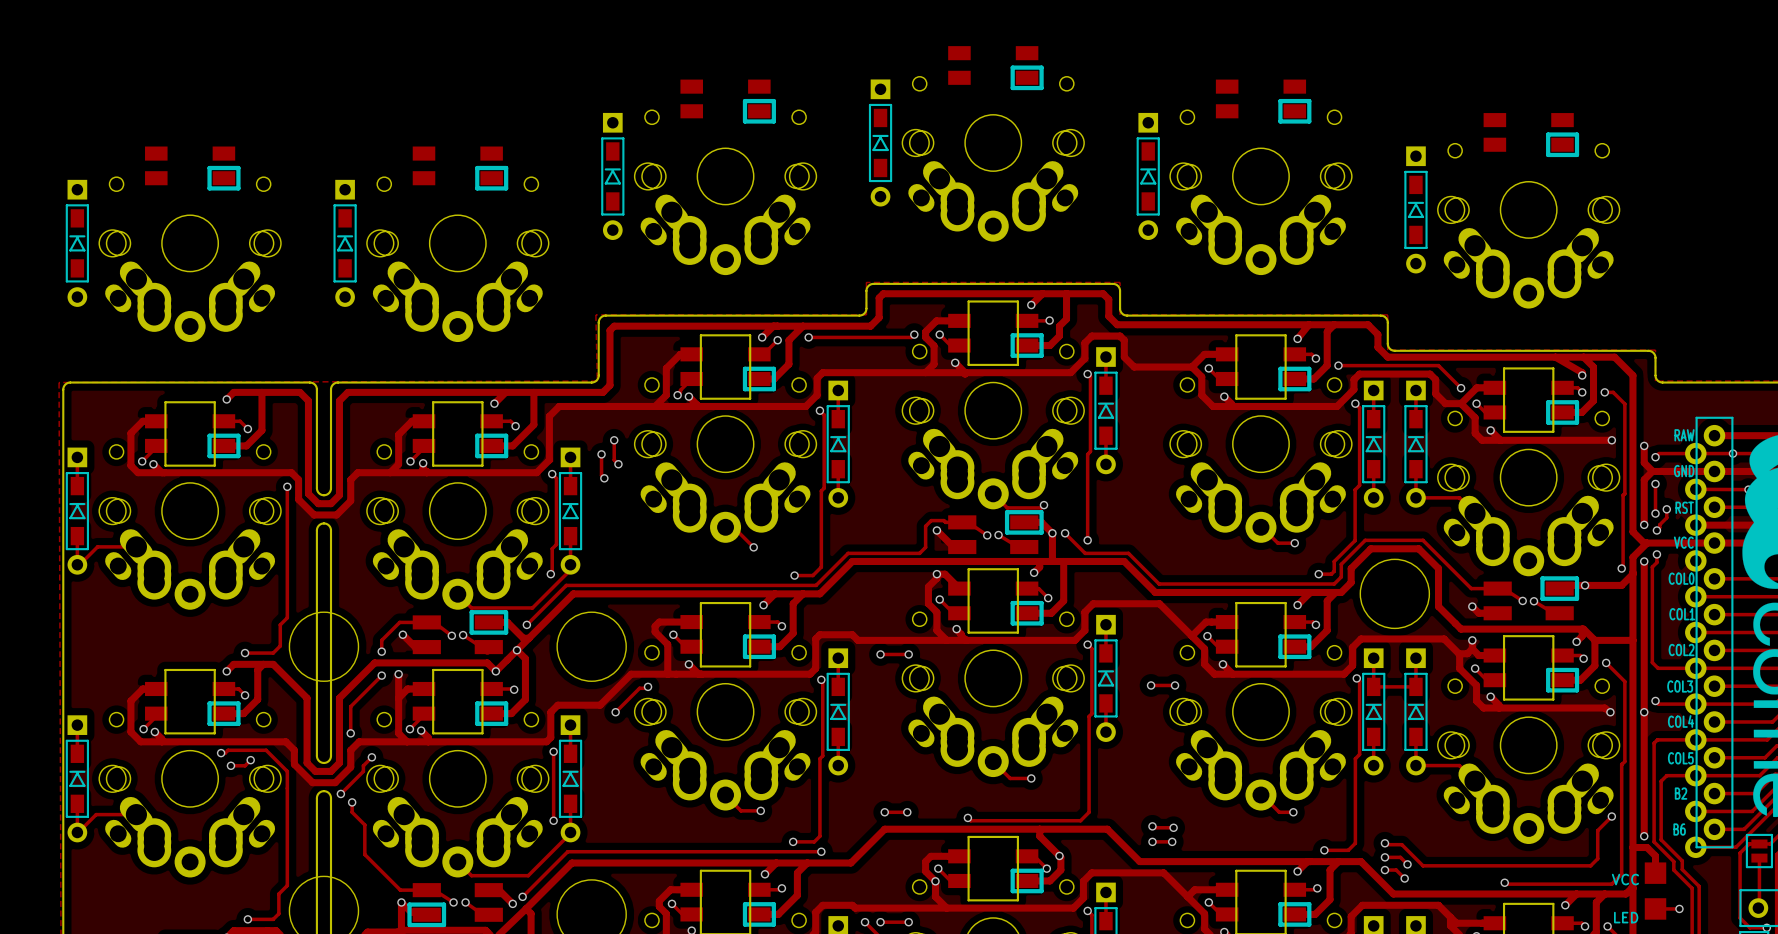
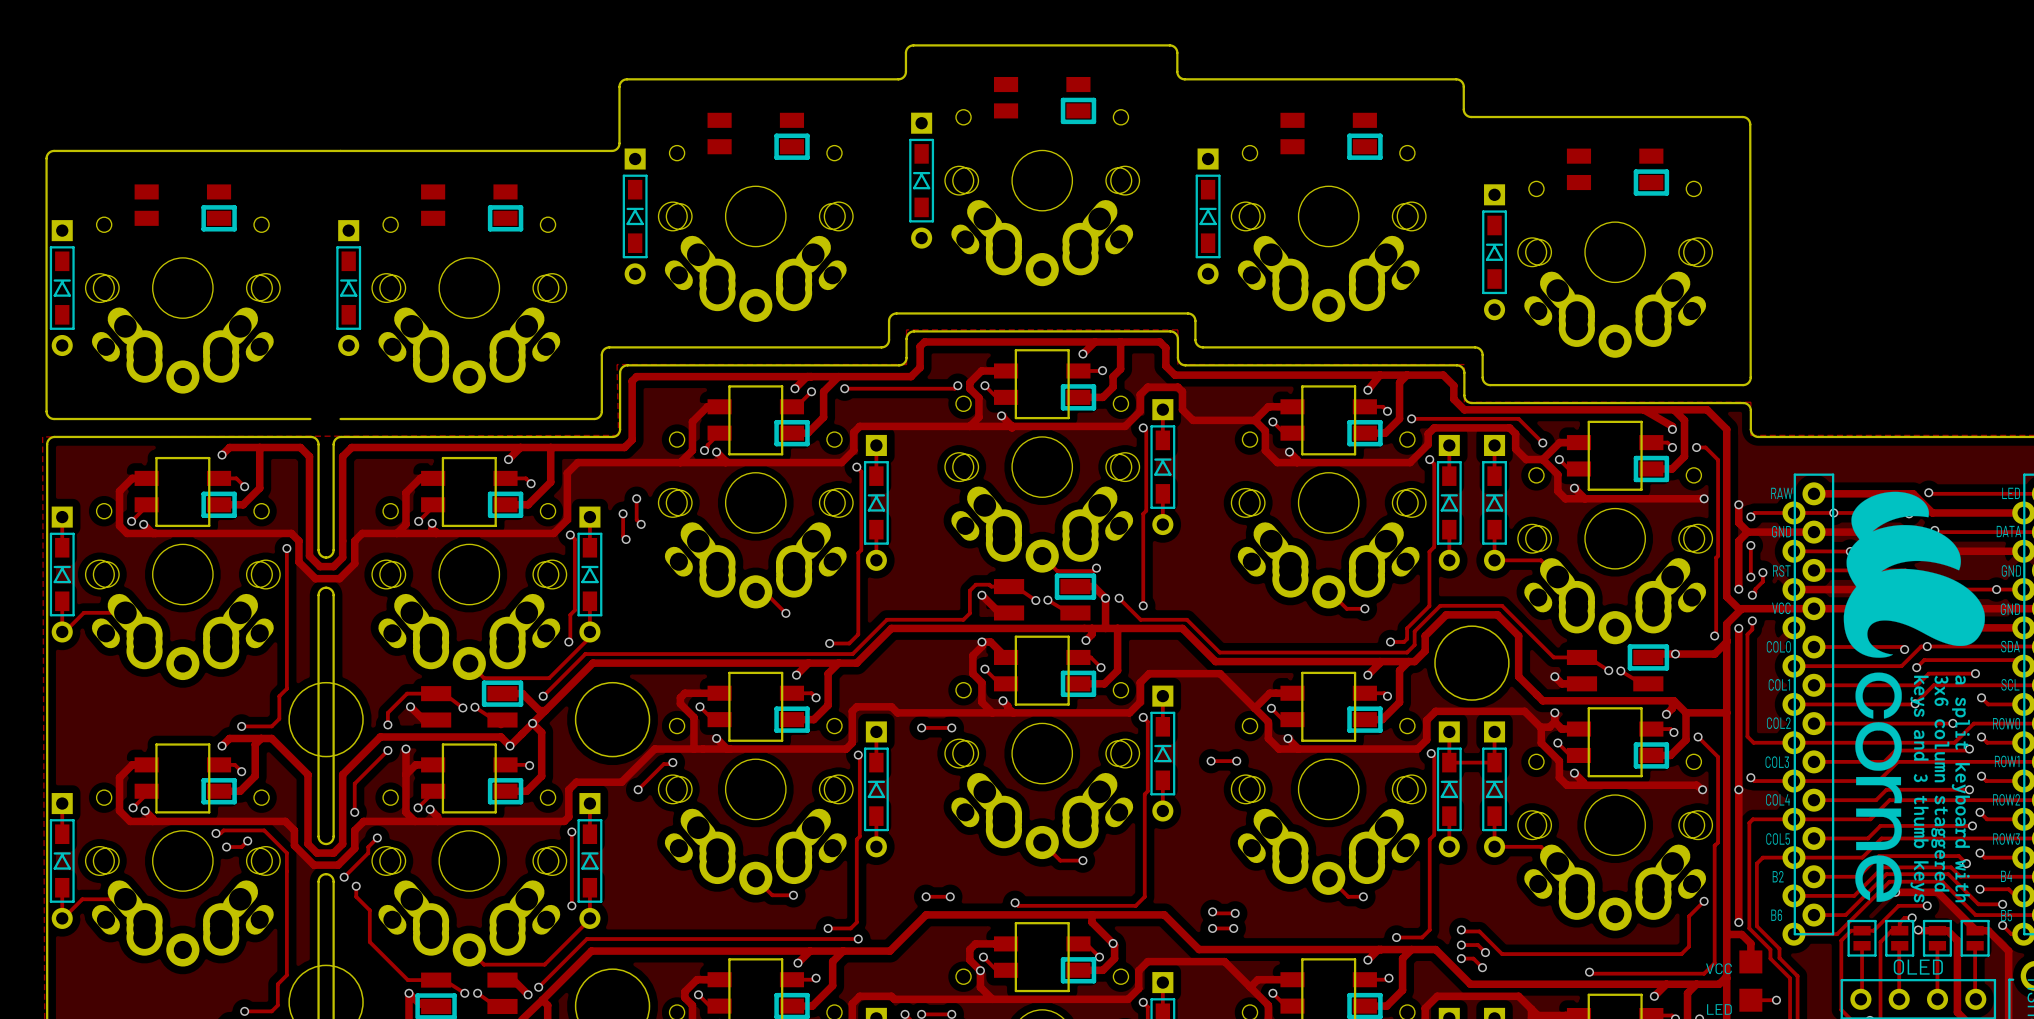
board edge: none -> (310, 419) (54, 419) (48, 416) (46, 411) (46, 158) (48, 153) (54, 150) (612, 150) (617, 148) (619, 144) (619, 85) (624, 79) (899, 79) (905, 73) (906, 50) (913, 45) (1170, 45) (1176, 50) (1177, 73) (1183, 79) (1457, 79) (1463, 83) (1464, 111) (1470, 116) (1742, 117) (1747, 118) (1749, 122) (1750, 377) (1749, 382) (1745, 384) (1489, 385) (1482, 379) (1482, 353) (1477, 347) (1201, 347) (1195, 342) (1195, 319) (1188, 313) (896, 313) (889, 318) (888, 341) (882, 347) (606, 347) (601, 353) (601, 412) (599, 416) (595, 418) (340, 419)

